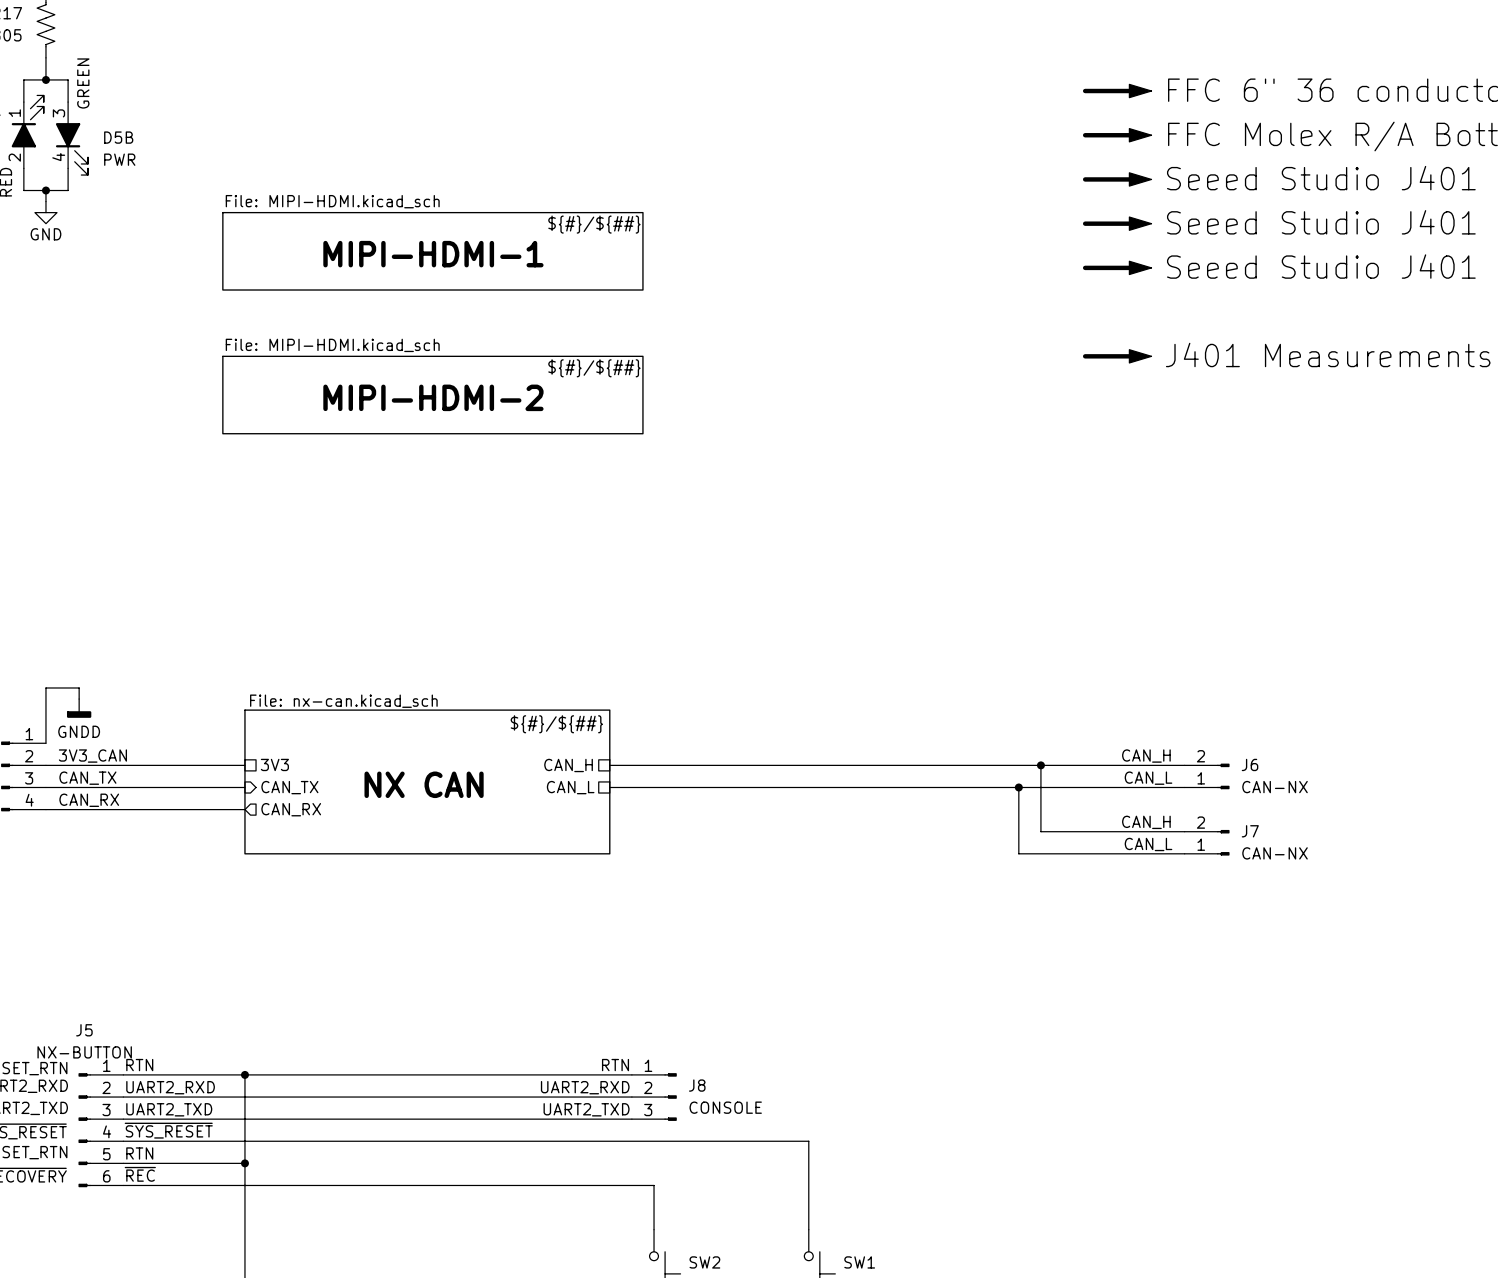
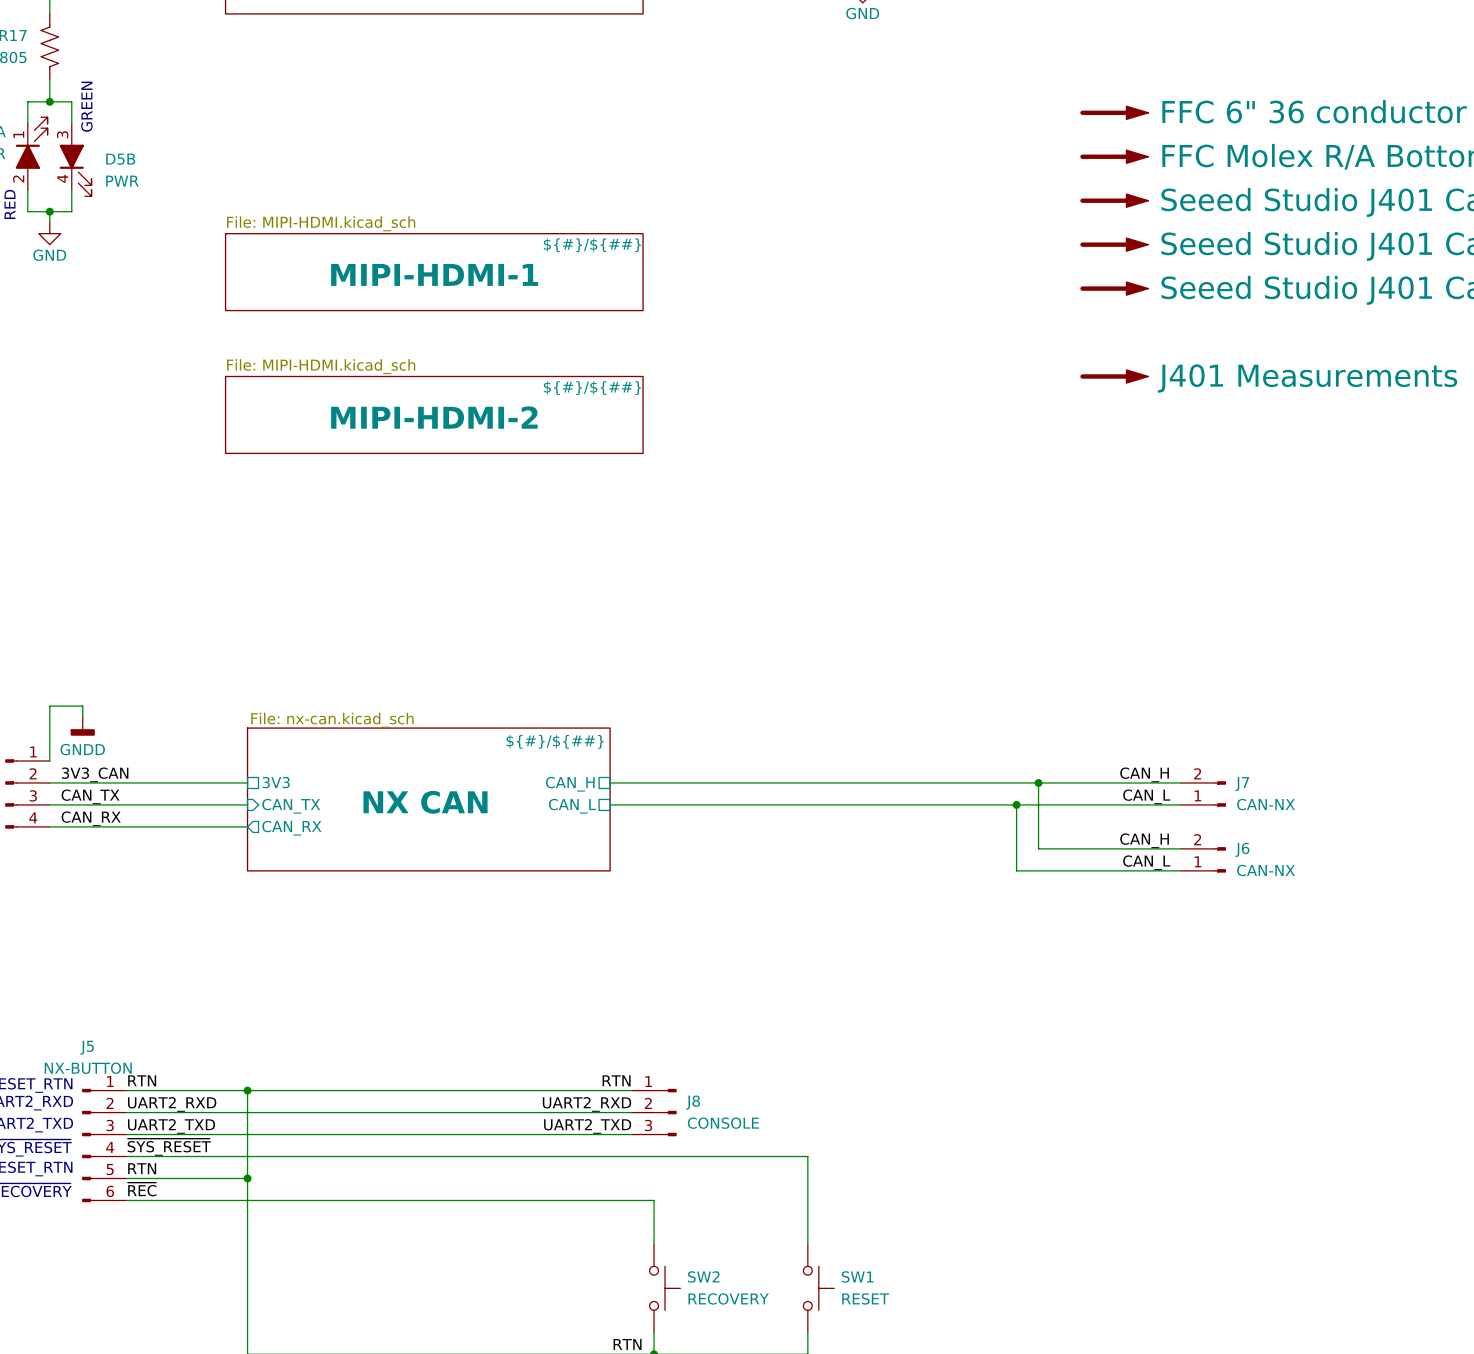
J6 name: J6 (1250, 764) -> J7 (1242, 784)
J7 name: J7 (1250, 831) -> J6 (1242, 849)

